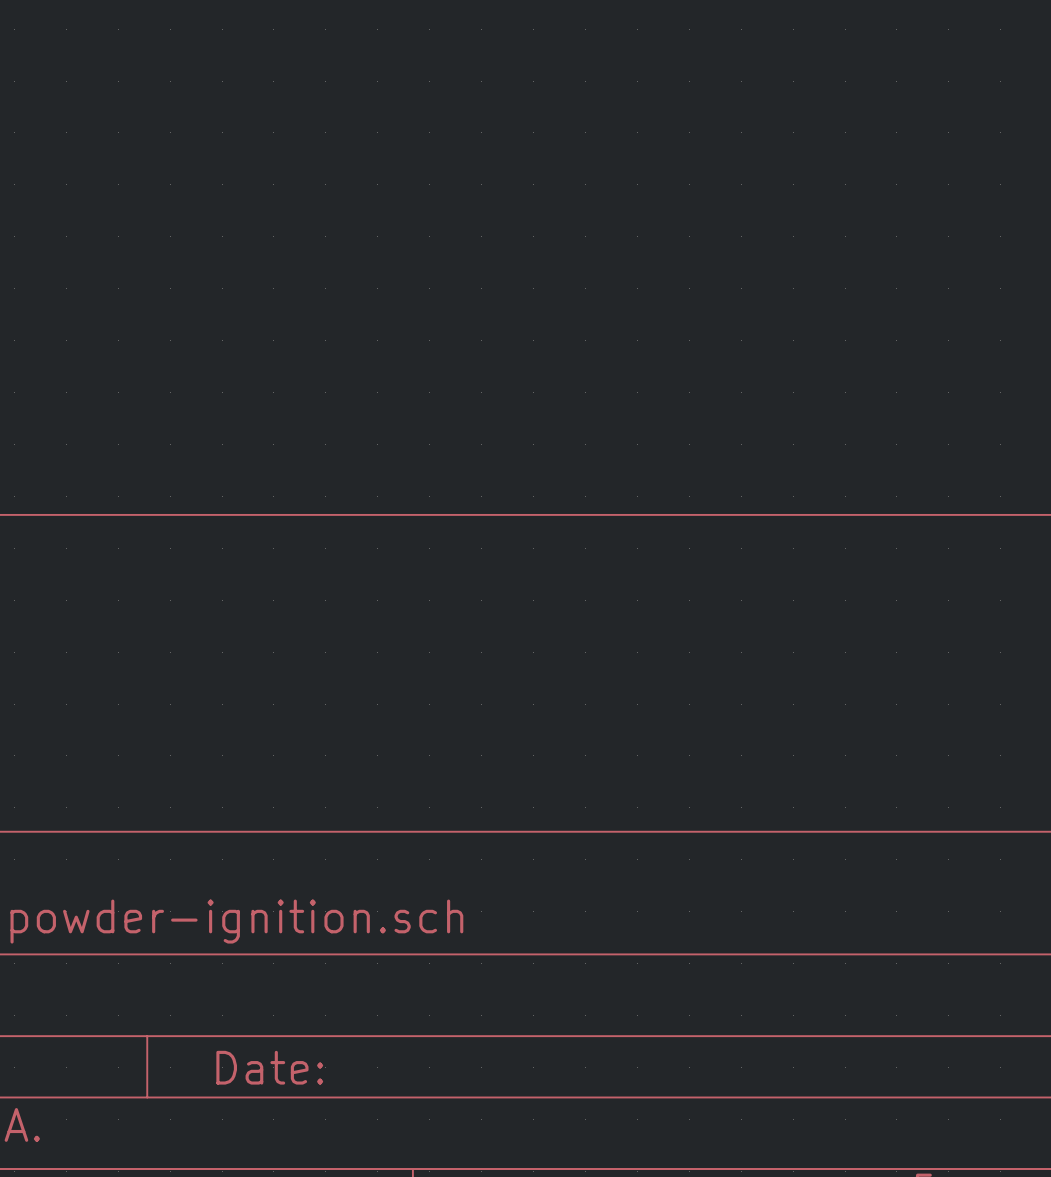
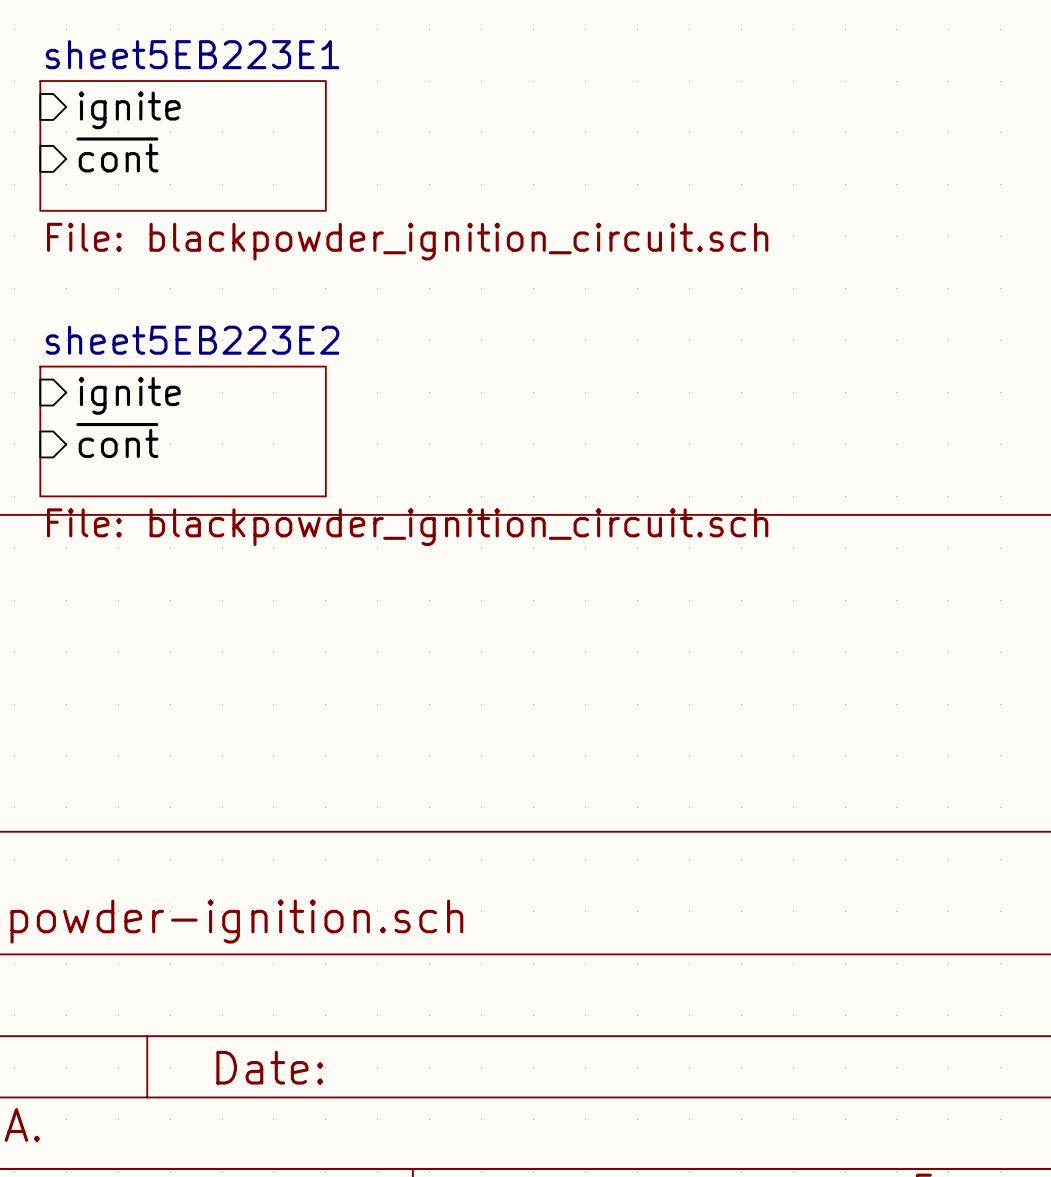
sheet pin: none -> ignite (129, 110)
sheet sheet5EB223E1: none -> File: blackpowder_ignition_circuit.sch (183, 145)
sheet pin: none -> ~{cont} (117, 154)
sheet pin: none -> ignite (129, 395)
sheet sheet5EB223E2: none -> File: blackpowder_ignition_circuit.sch (183, 431)
sheet pin: none -> ~{cont} (117, 440)

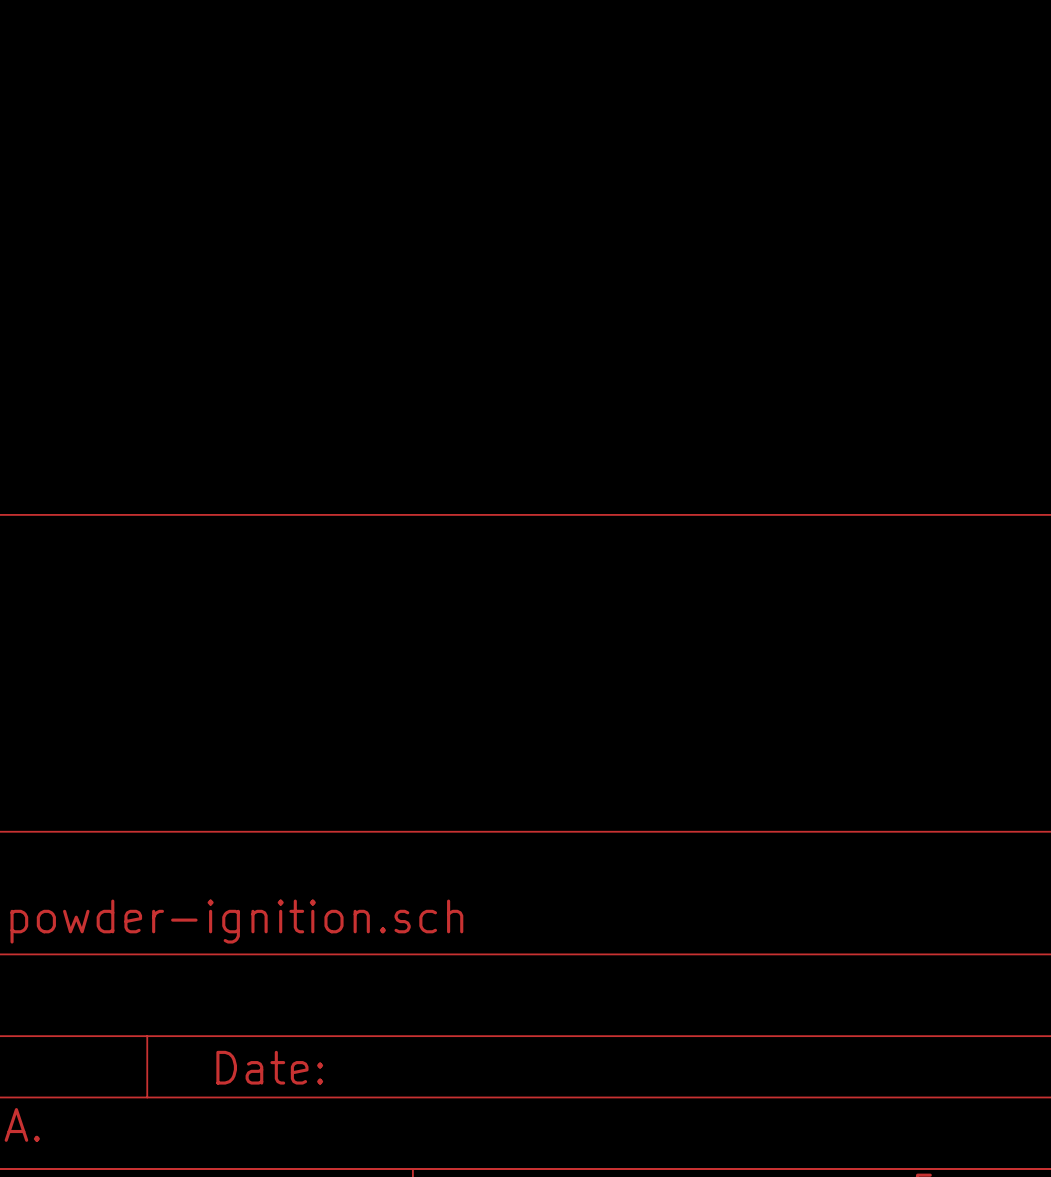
sheet pin: ignite (129, 110) -> none
sheet sheet5EB223E1: File: blackpowder_ignition_circuit.sch (183, 145) -> none
sheet pin: ~{cont} (117, 154) -> none
sheet pin: ignite (129, 395) -> none
sheet sheet5EB223E2: File: blackpowder_ignition_circuit.sch (183, 431) -> none
sheet pin: ~{cont} (117, 440) -> none

